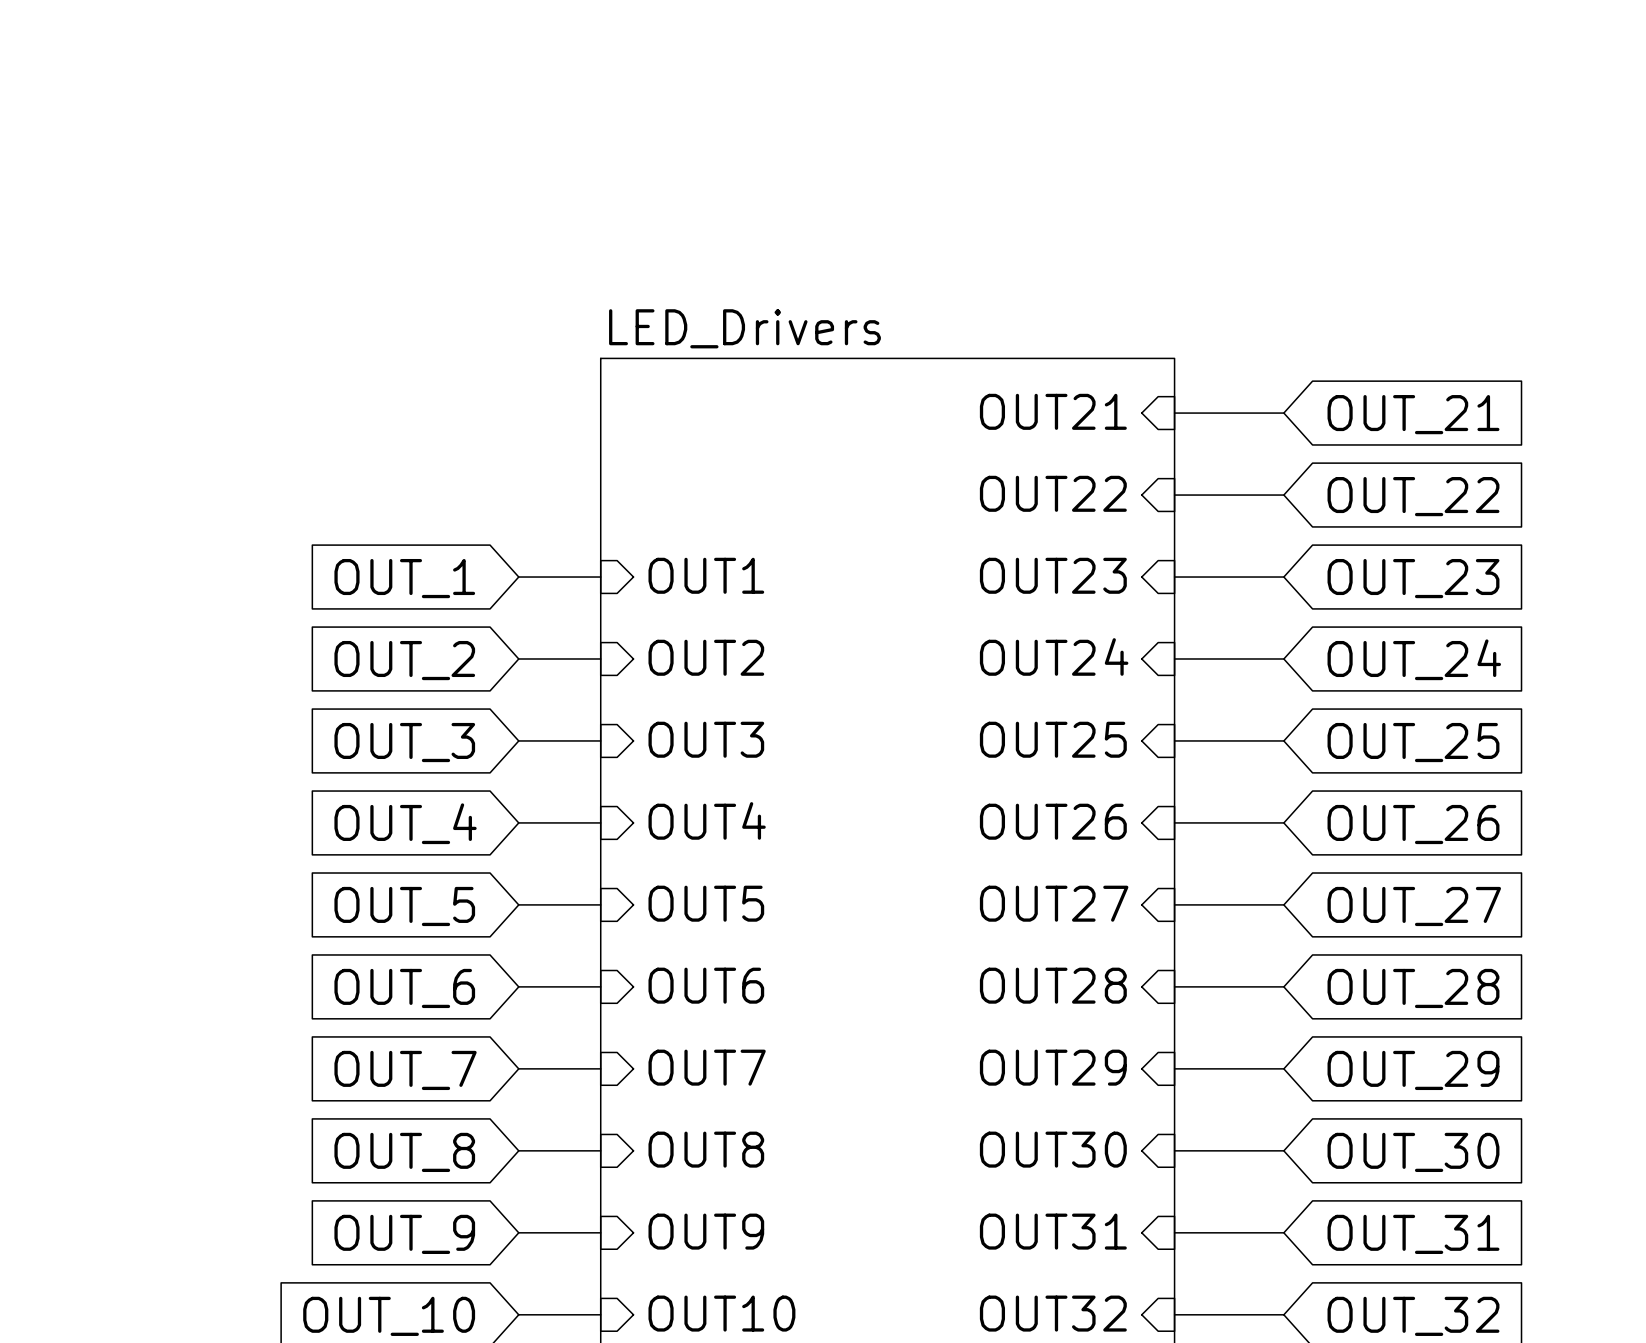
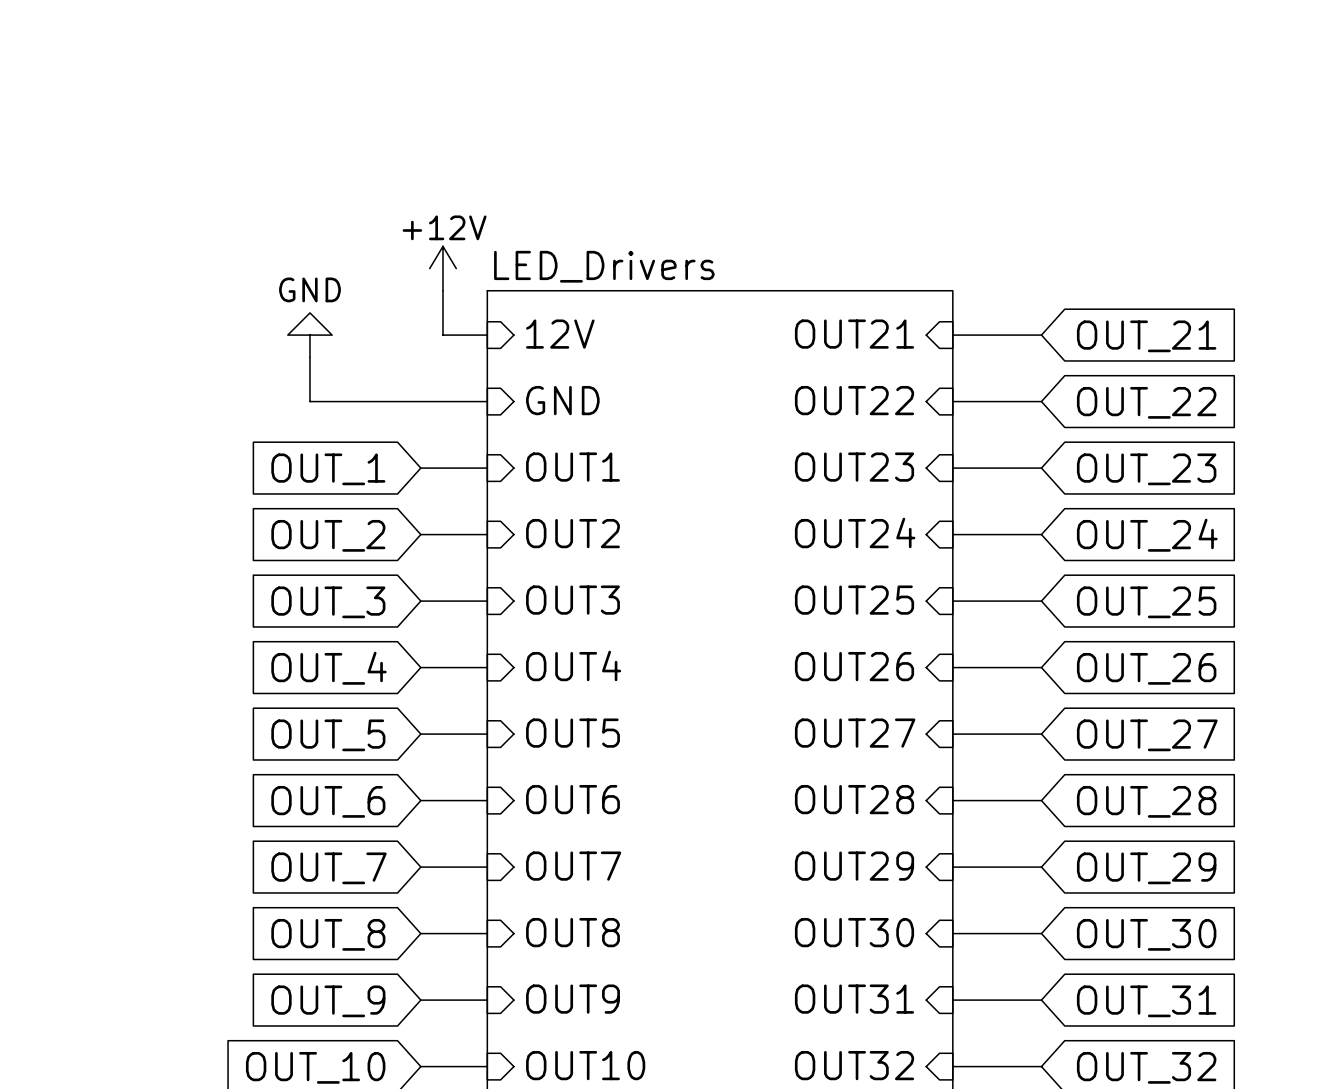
power symbol: none -> +12V (442, 268)
wire: none -> (442, 290) (442, 335) (487, 335)
sheet pin: none -> 12V (560, 334)
power symbol: none -> GND (309, 335)
wire: none -> (309, 357) (309, 401) (487, 401)
sheet pin: none -> GND (562, 400)

